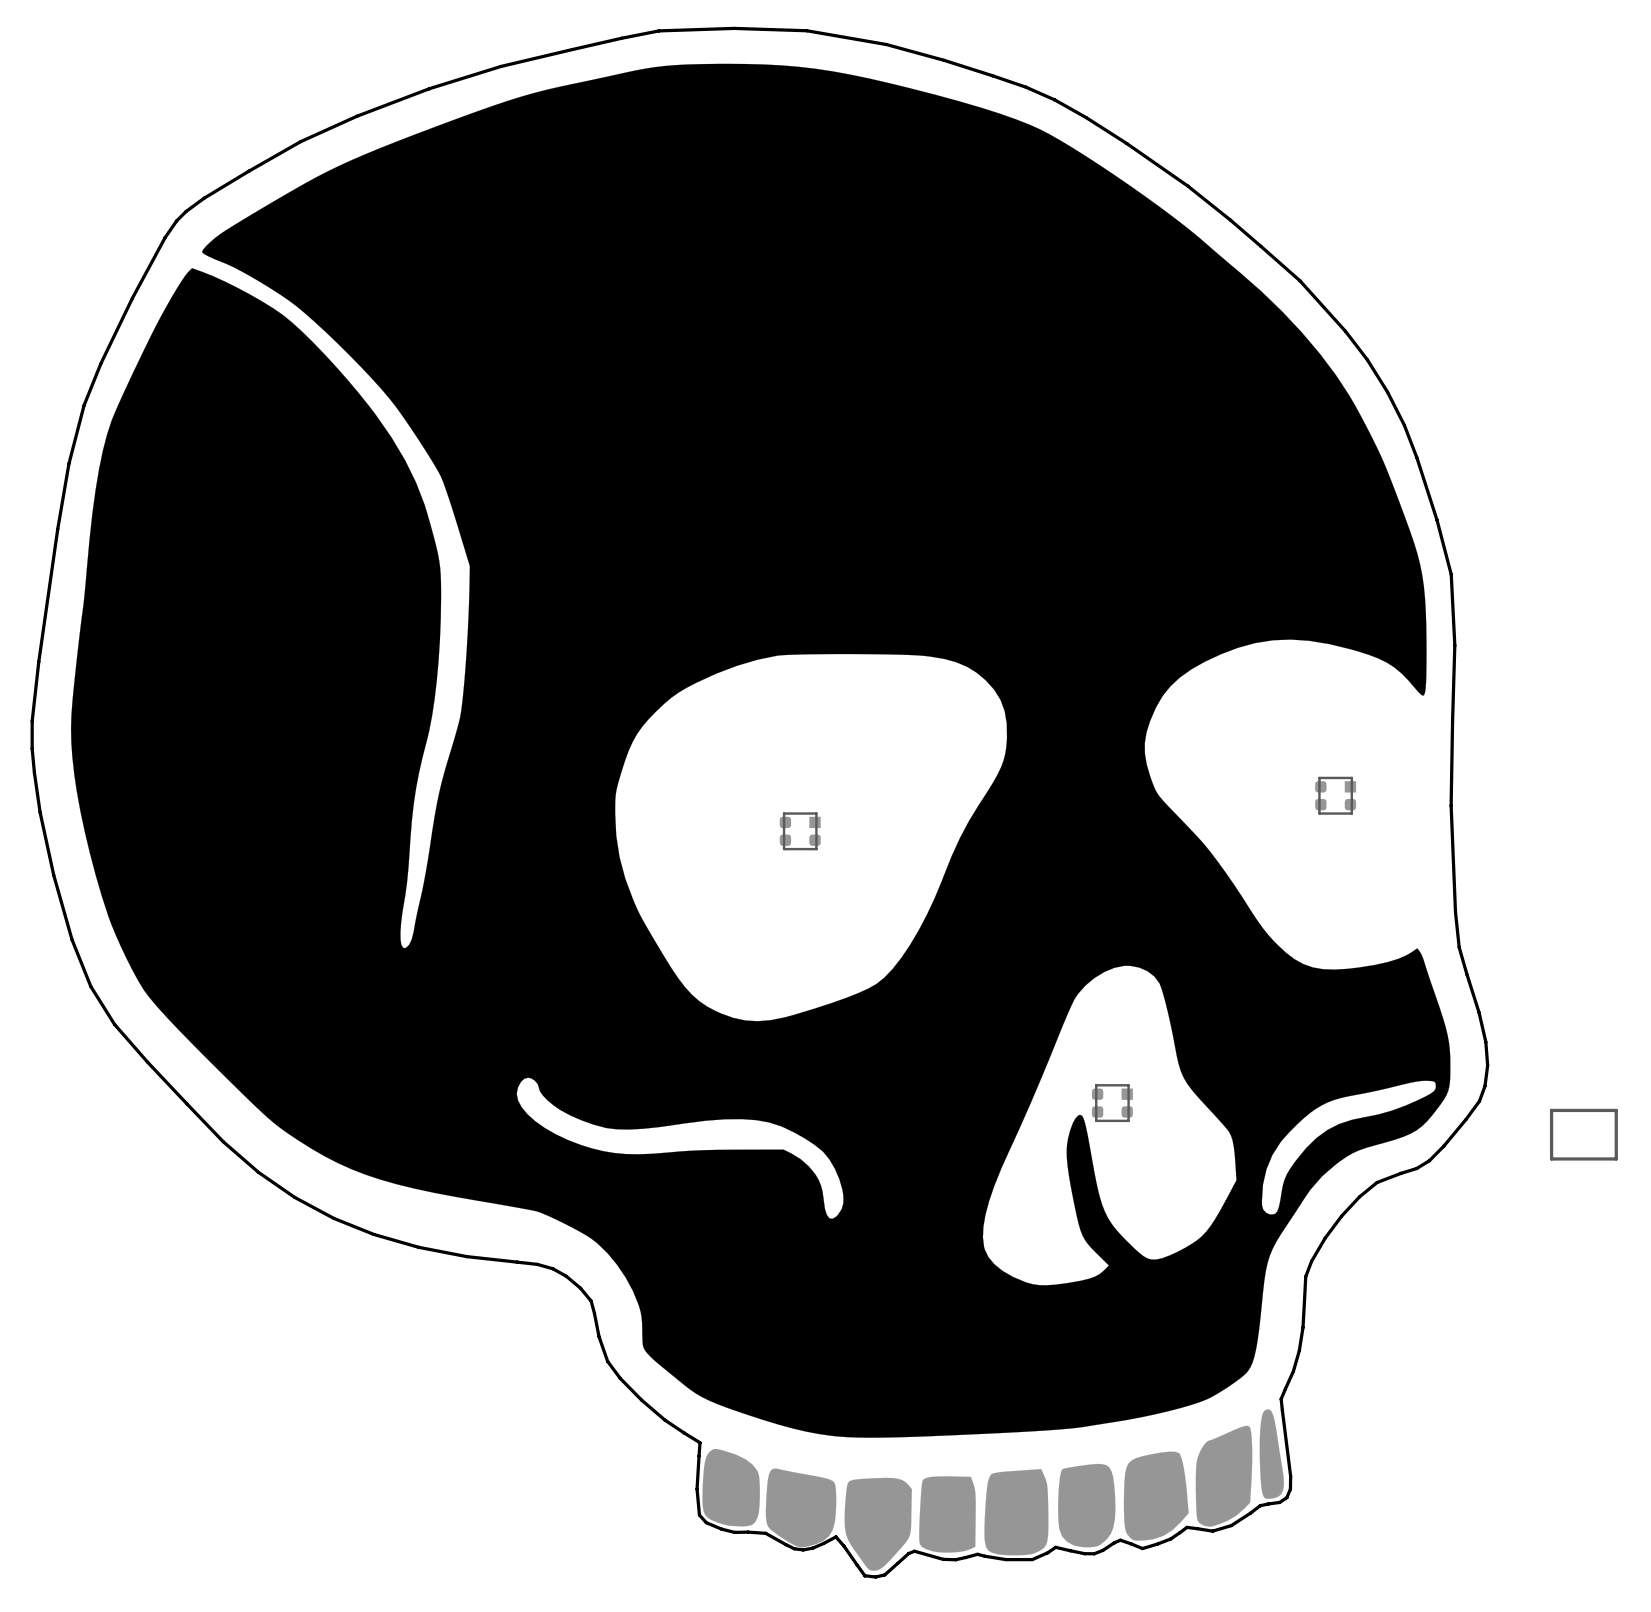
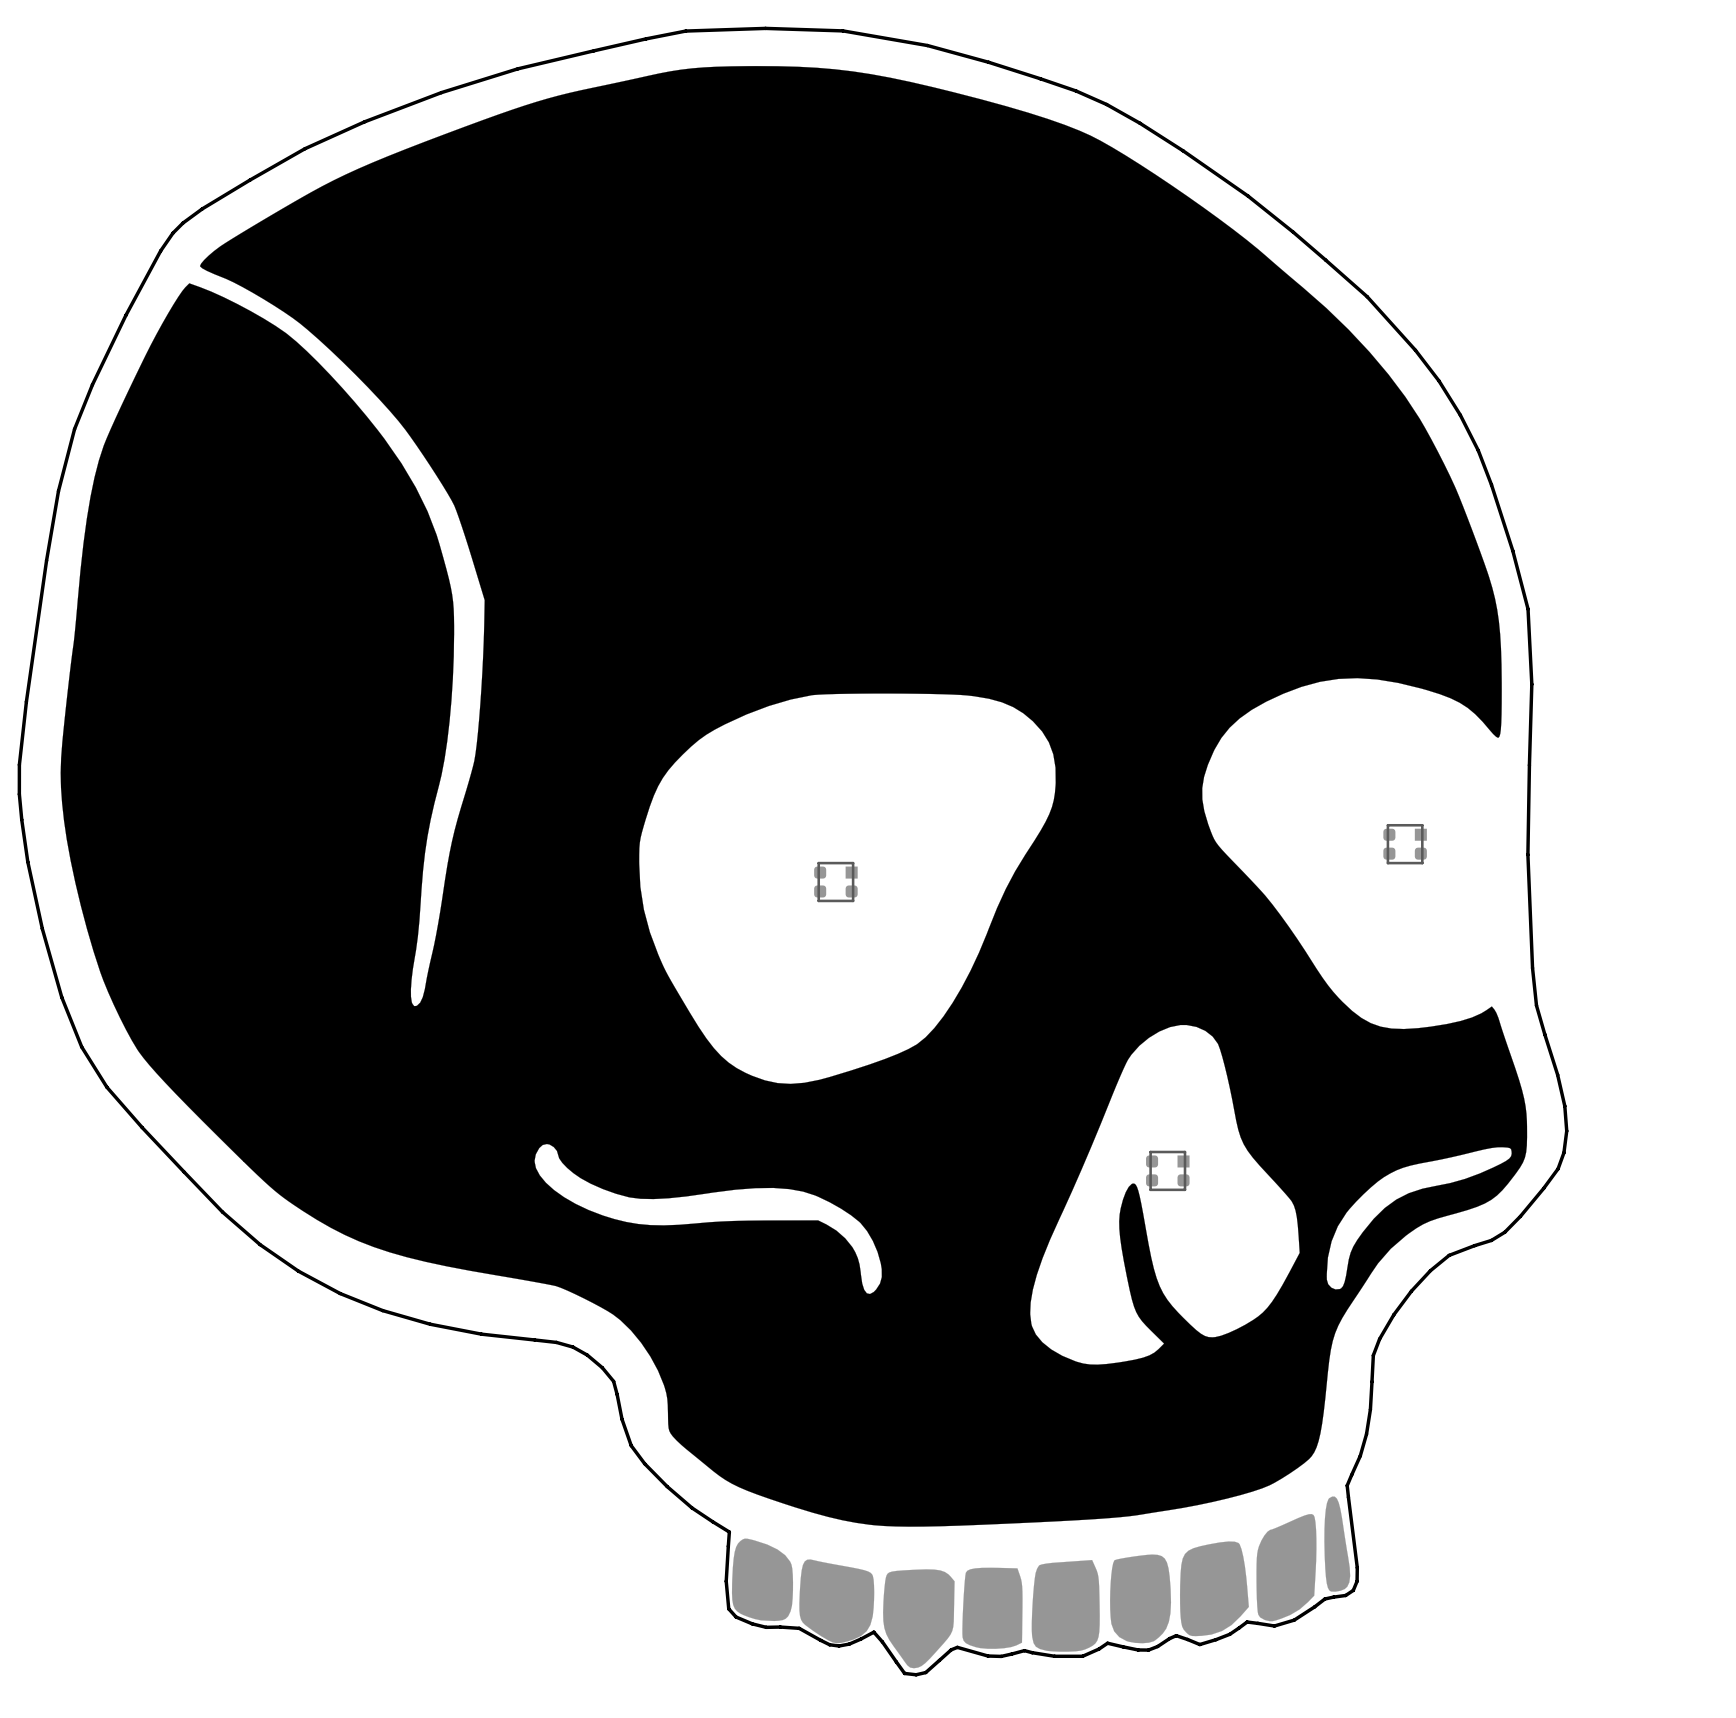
line: (1551, 1110) (1616, 1110) (1616, 1158) (1551, 1158) (1551, 1110) -> none

